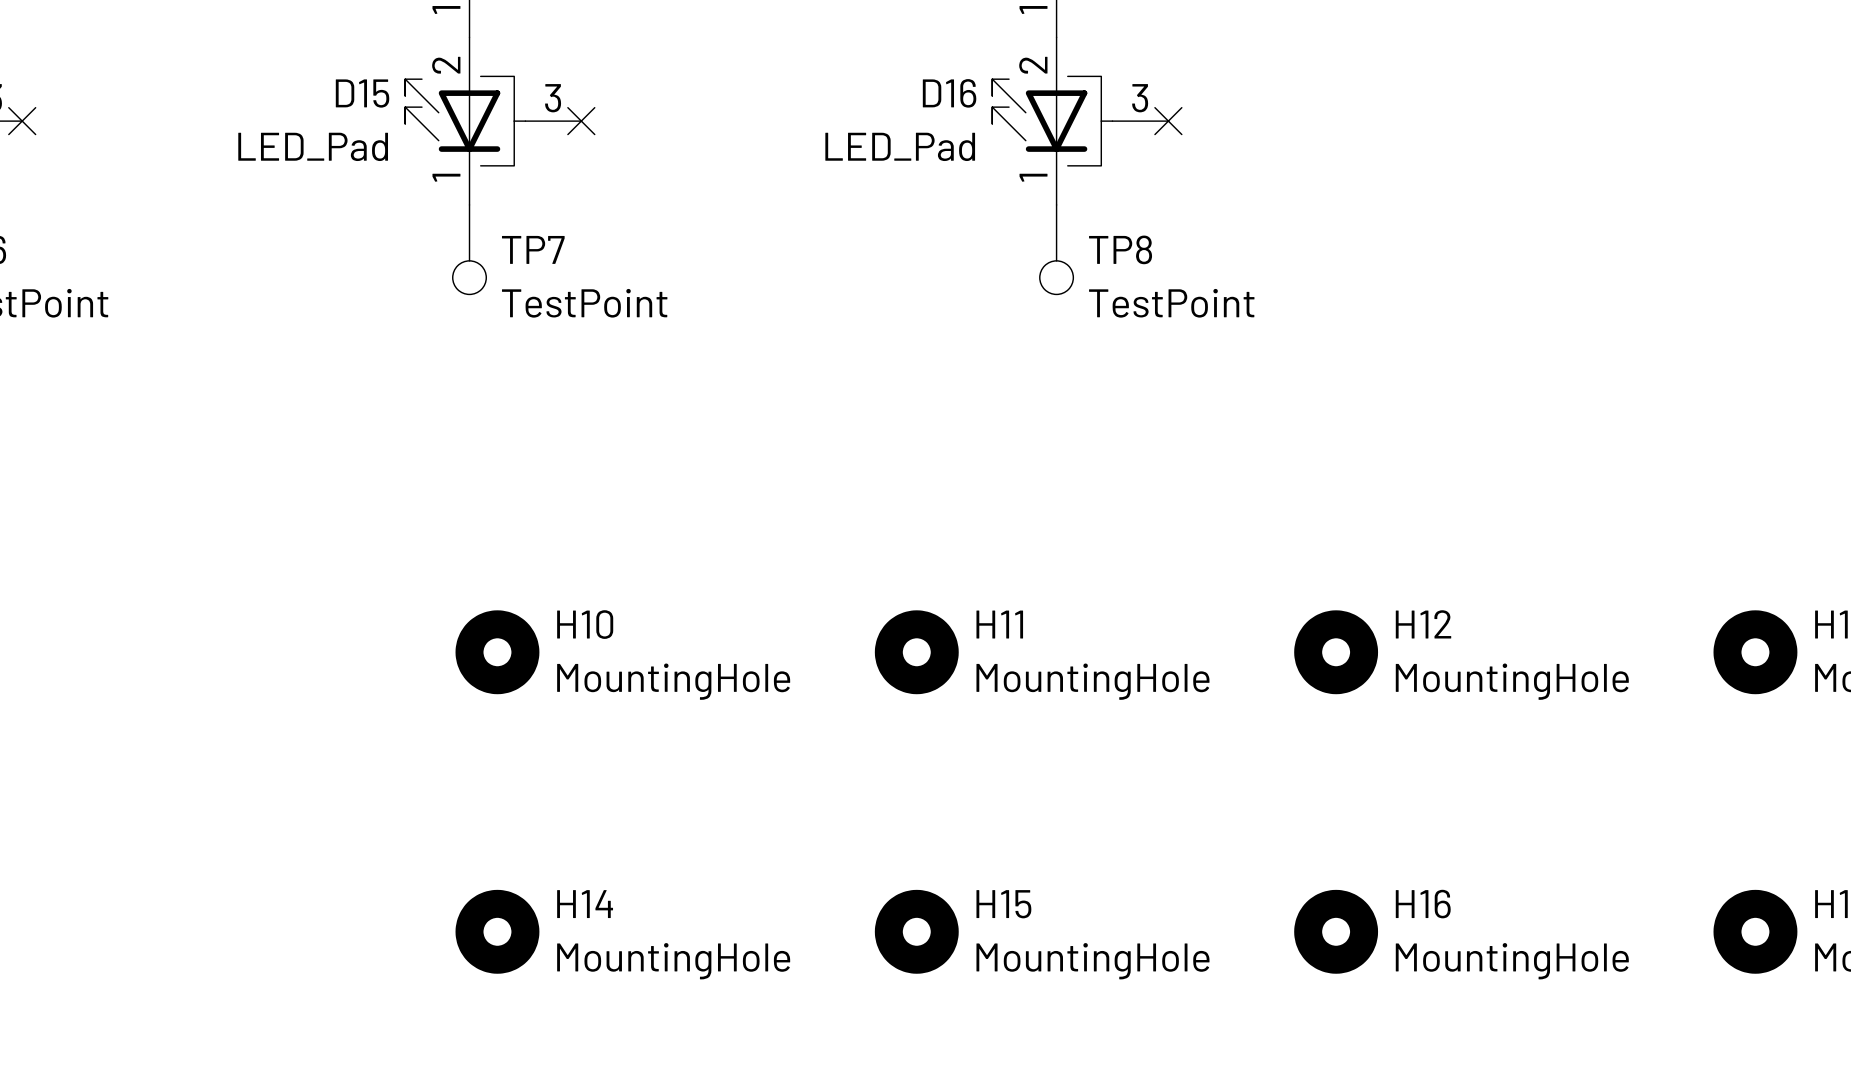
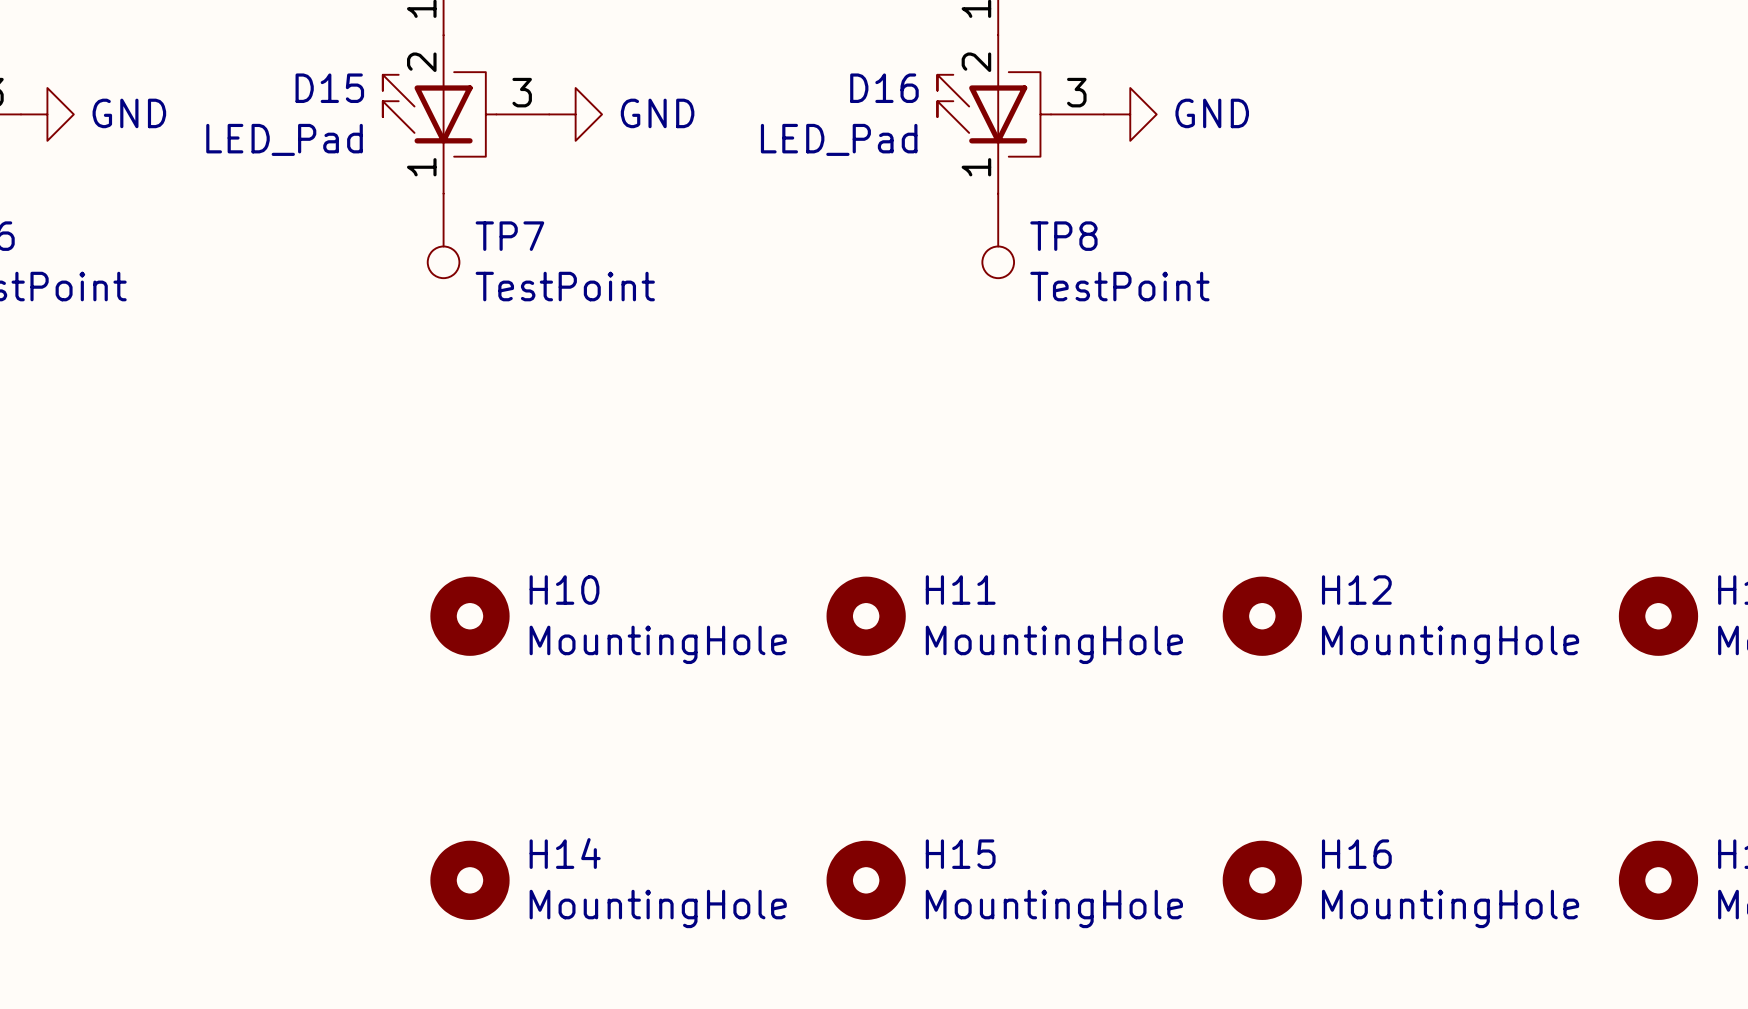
no-connect mark: (22, 121) -> none
power symbol: none -> GND (47, 114)
no-connect mark: (581, 121) -> none
power symbol: none -> GND (575, 114)
no-connect mark: (1168, 121) -> none
power symbol: none -> GND (1130, 114)

